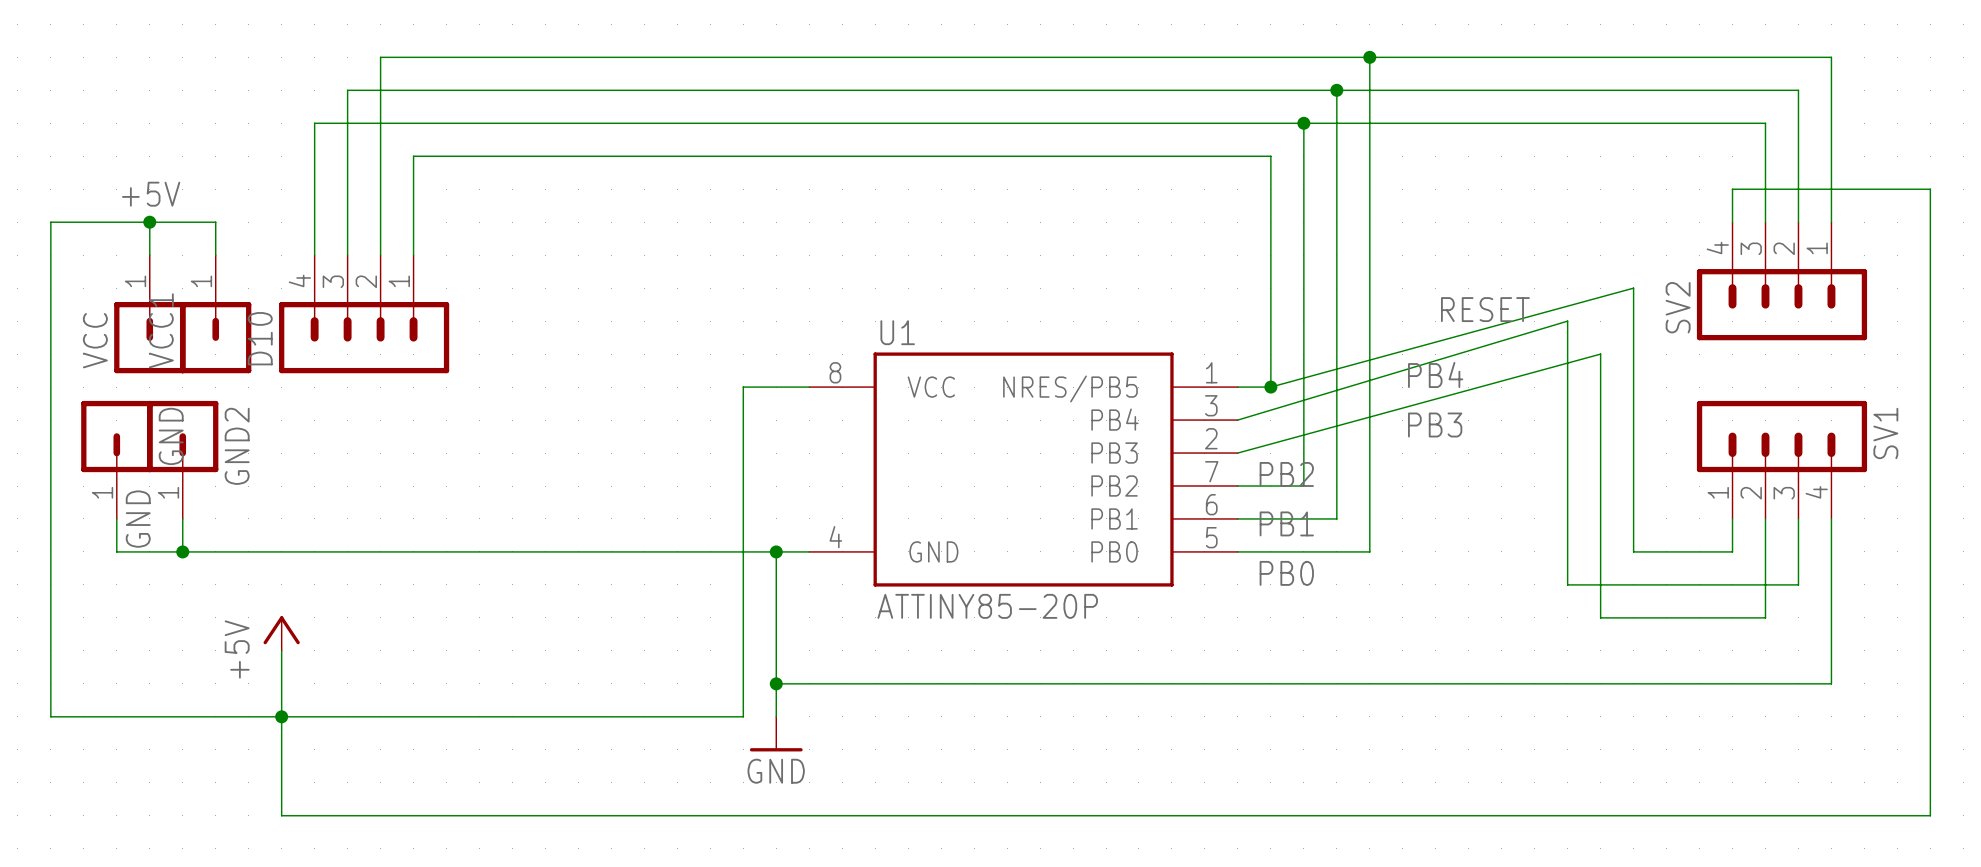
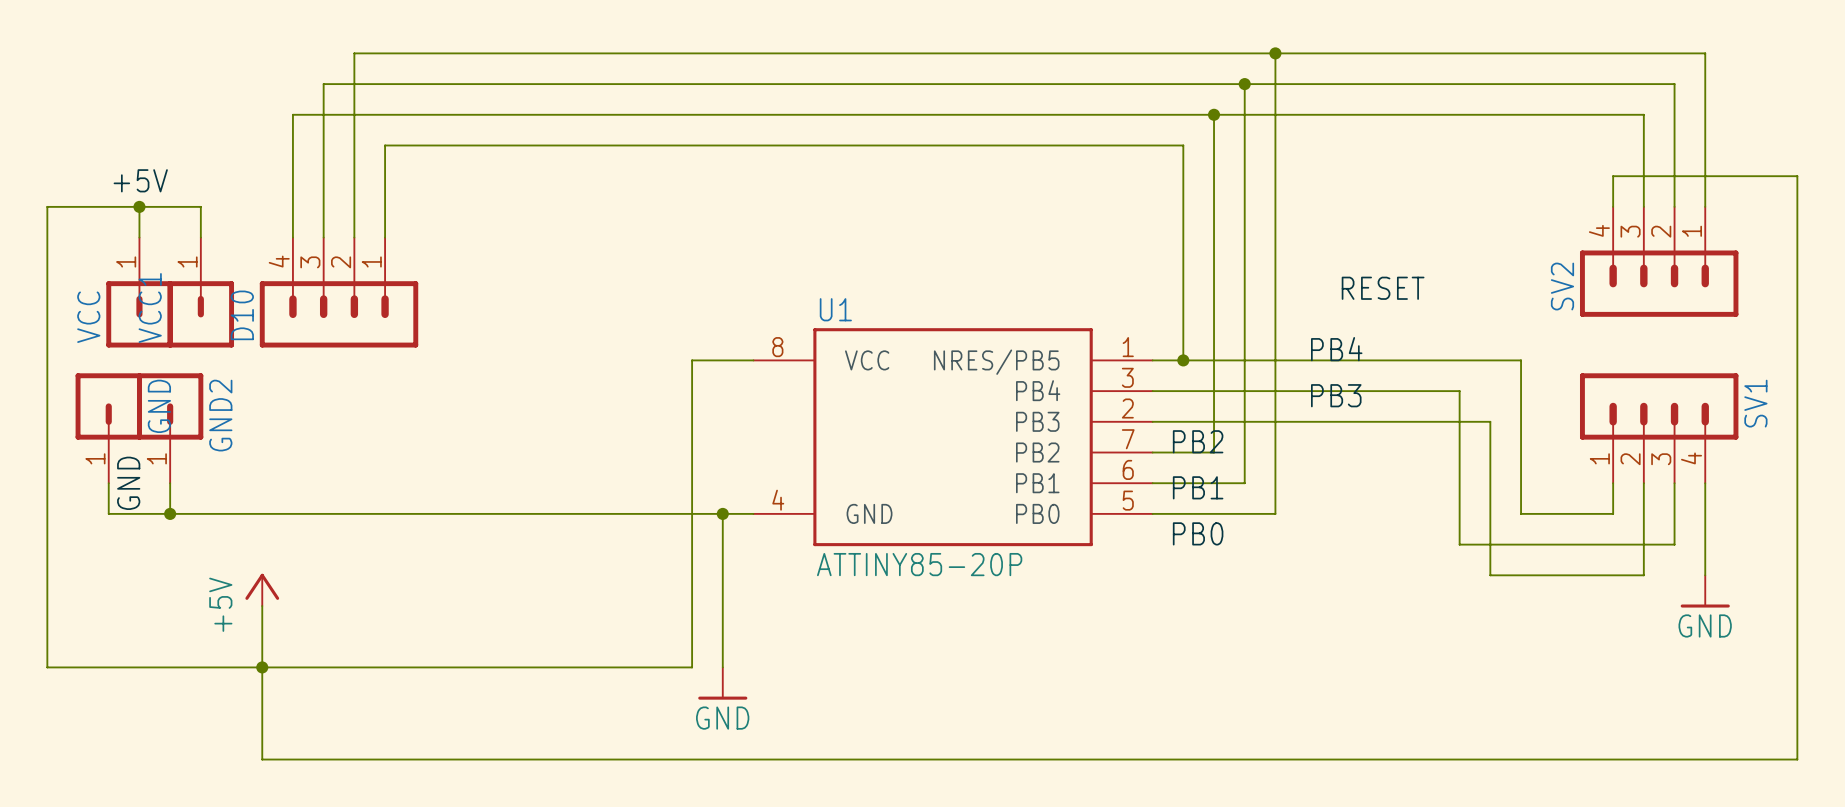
wire: (1270, 387) (1633, 288) (1633, 387) -> (1183, 360) (1521, 360)
wire: (1237, 420) (1567, 321) (1567, 420) -> (1152, 391) (1459, 391)
wire: (1237, 453) (1600, 354) (1600, 453) -> (1152, 421) (1490, 421)
wire: (1831, 617) (1831, 683) (776, 683) -> none
power symbol: none -> GND (1705, 591)
junction: (776, 683) -> none

